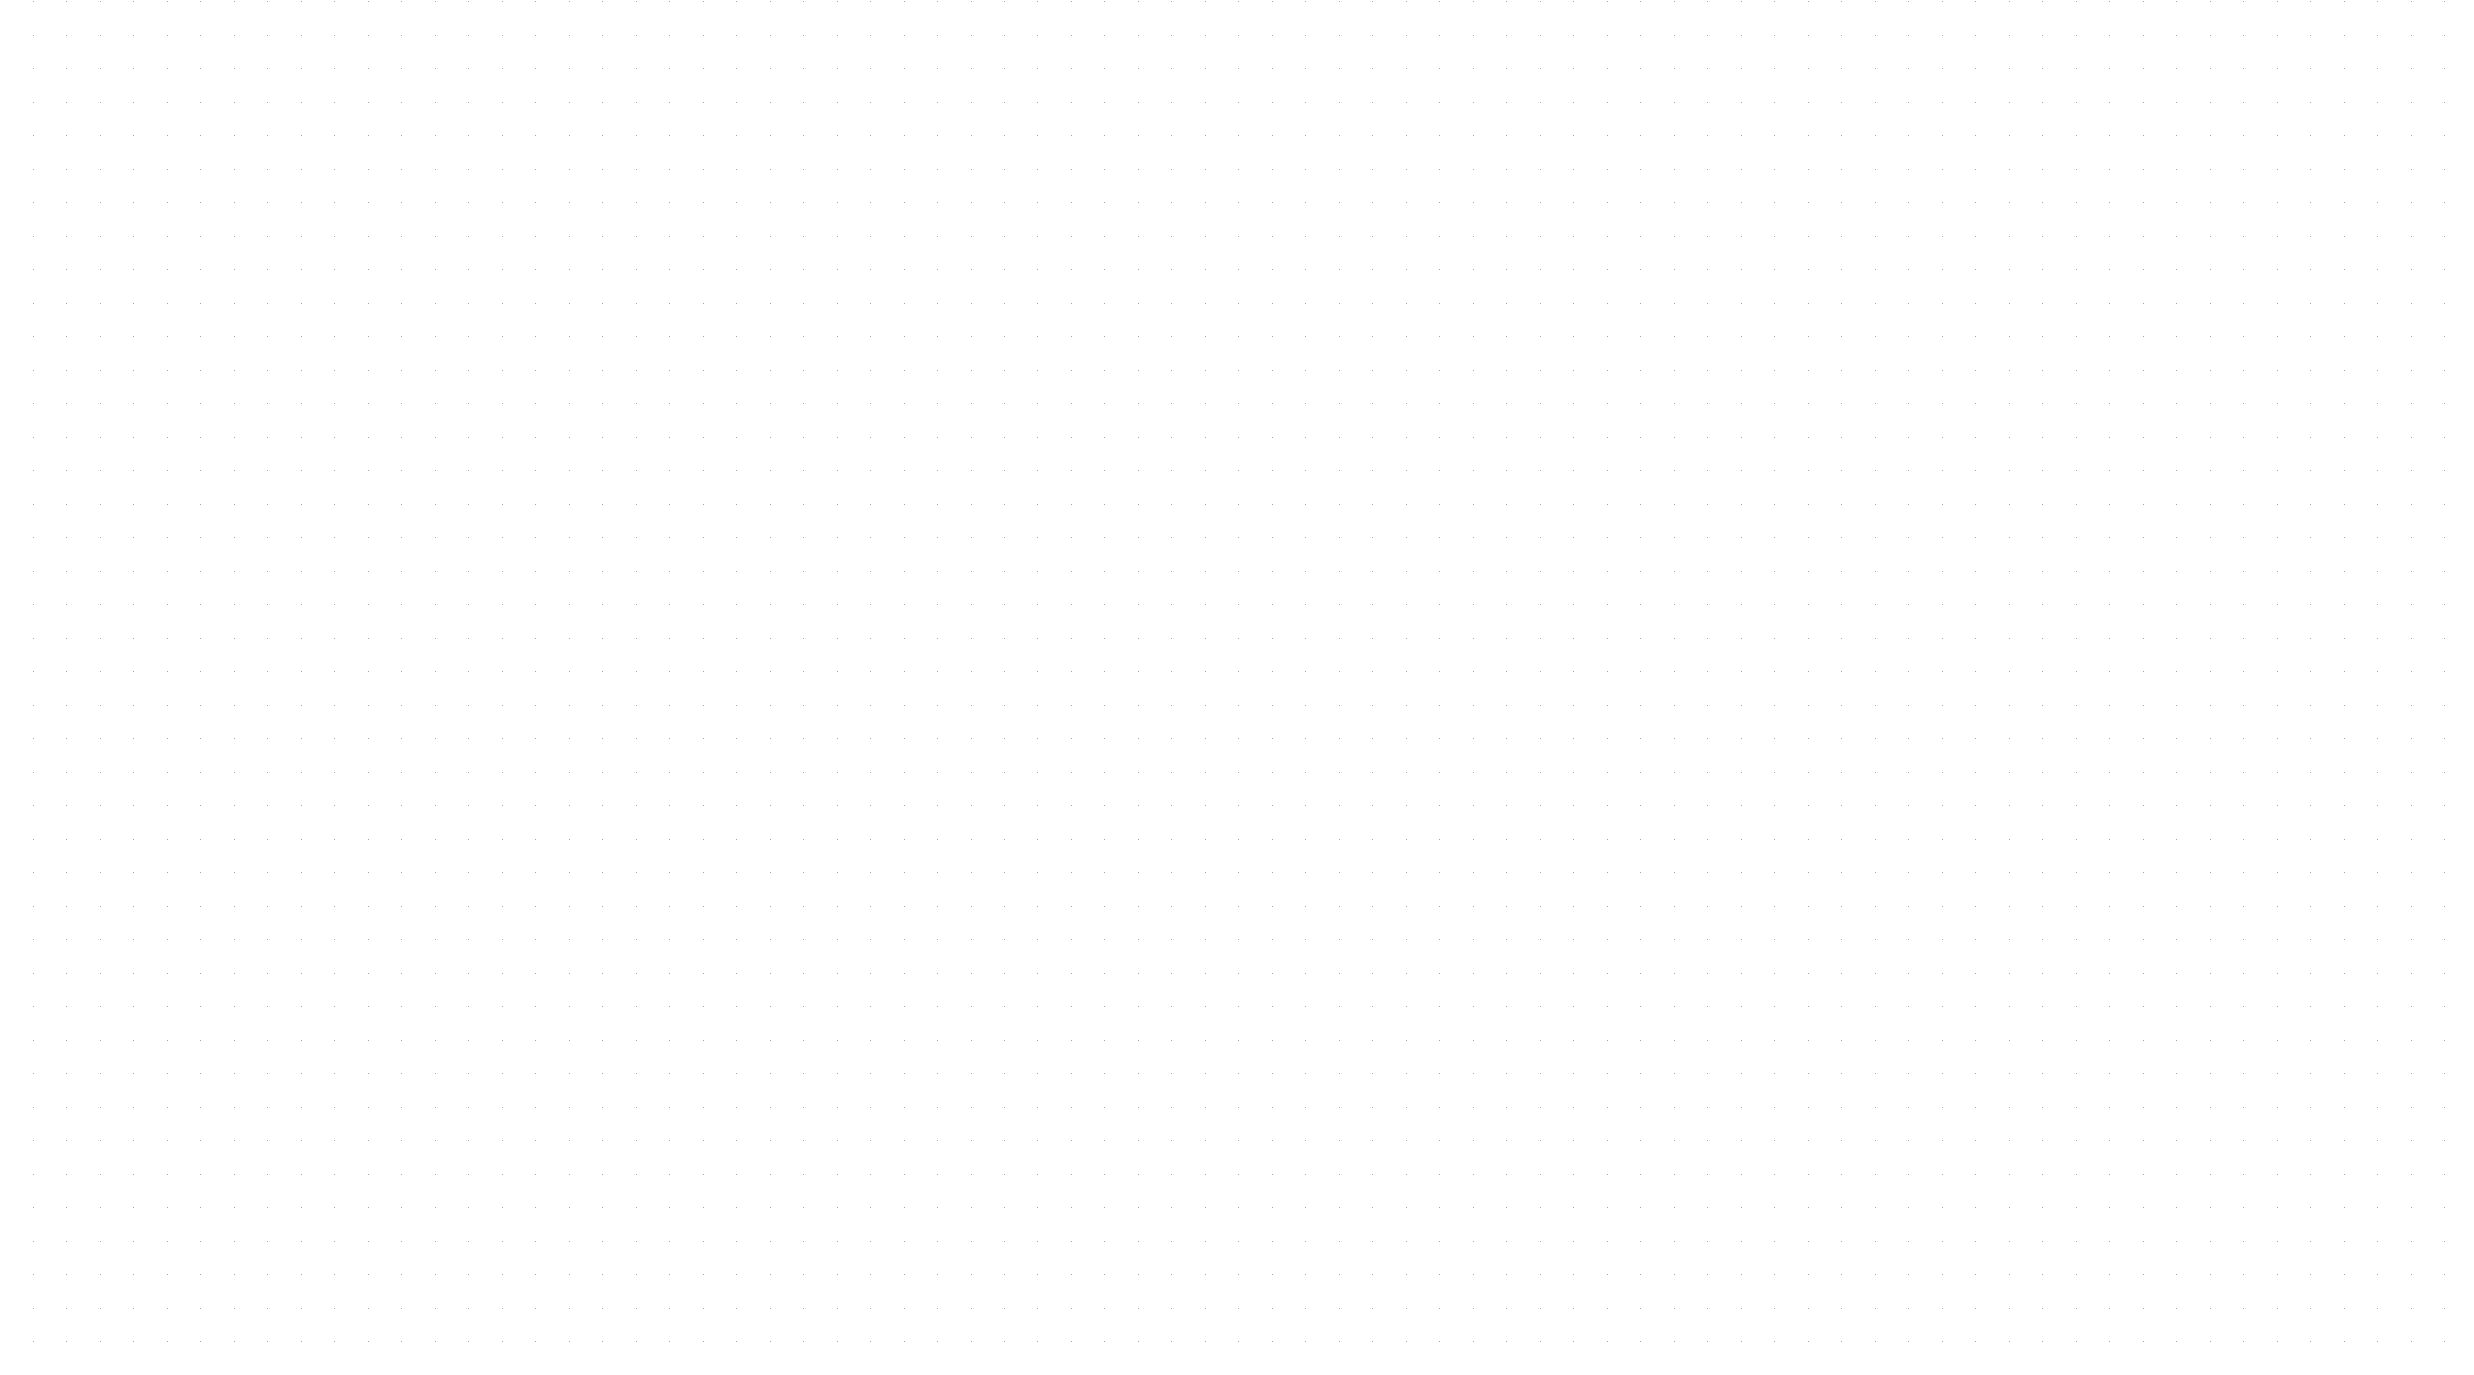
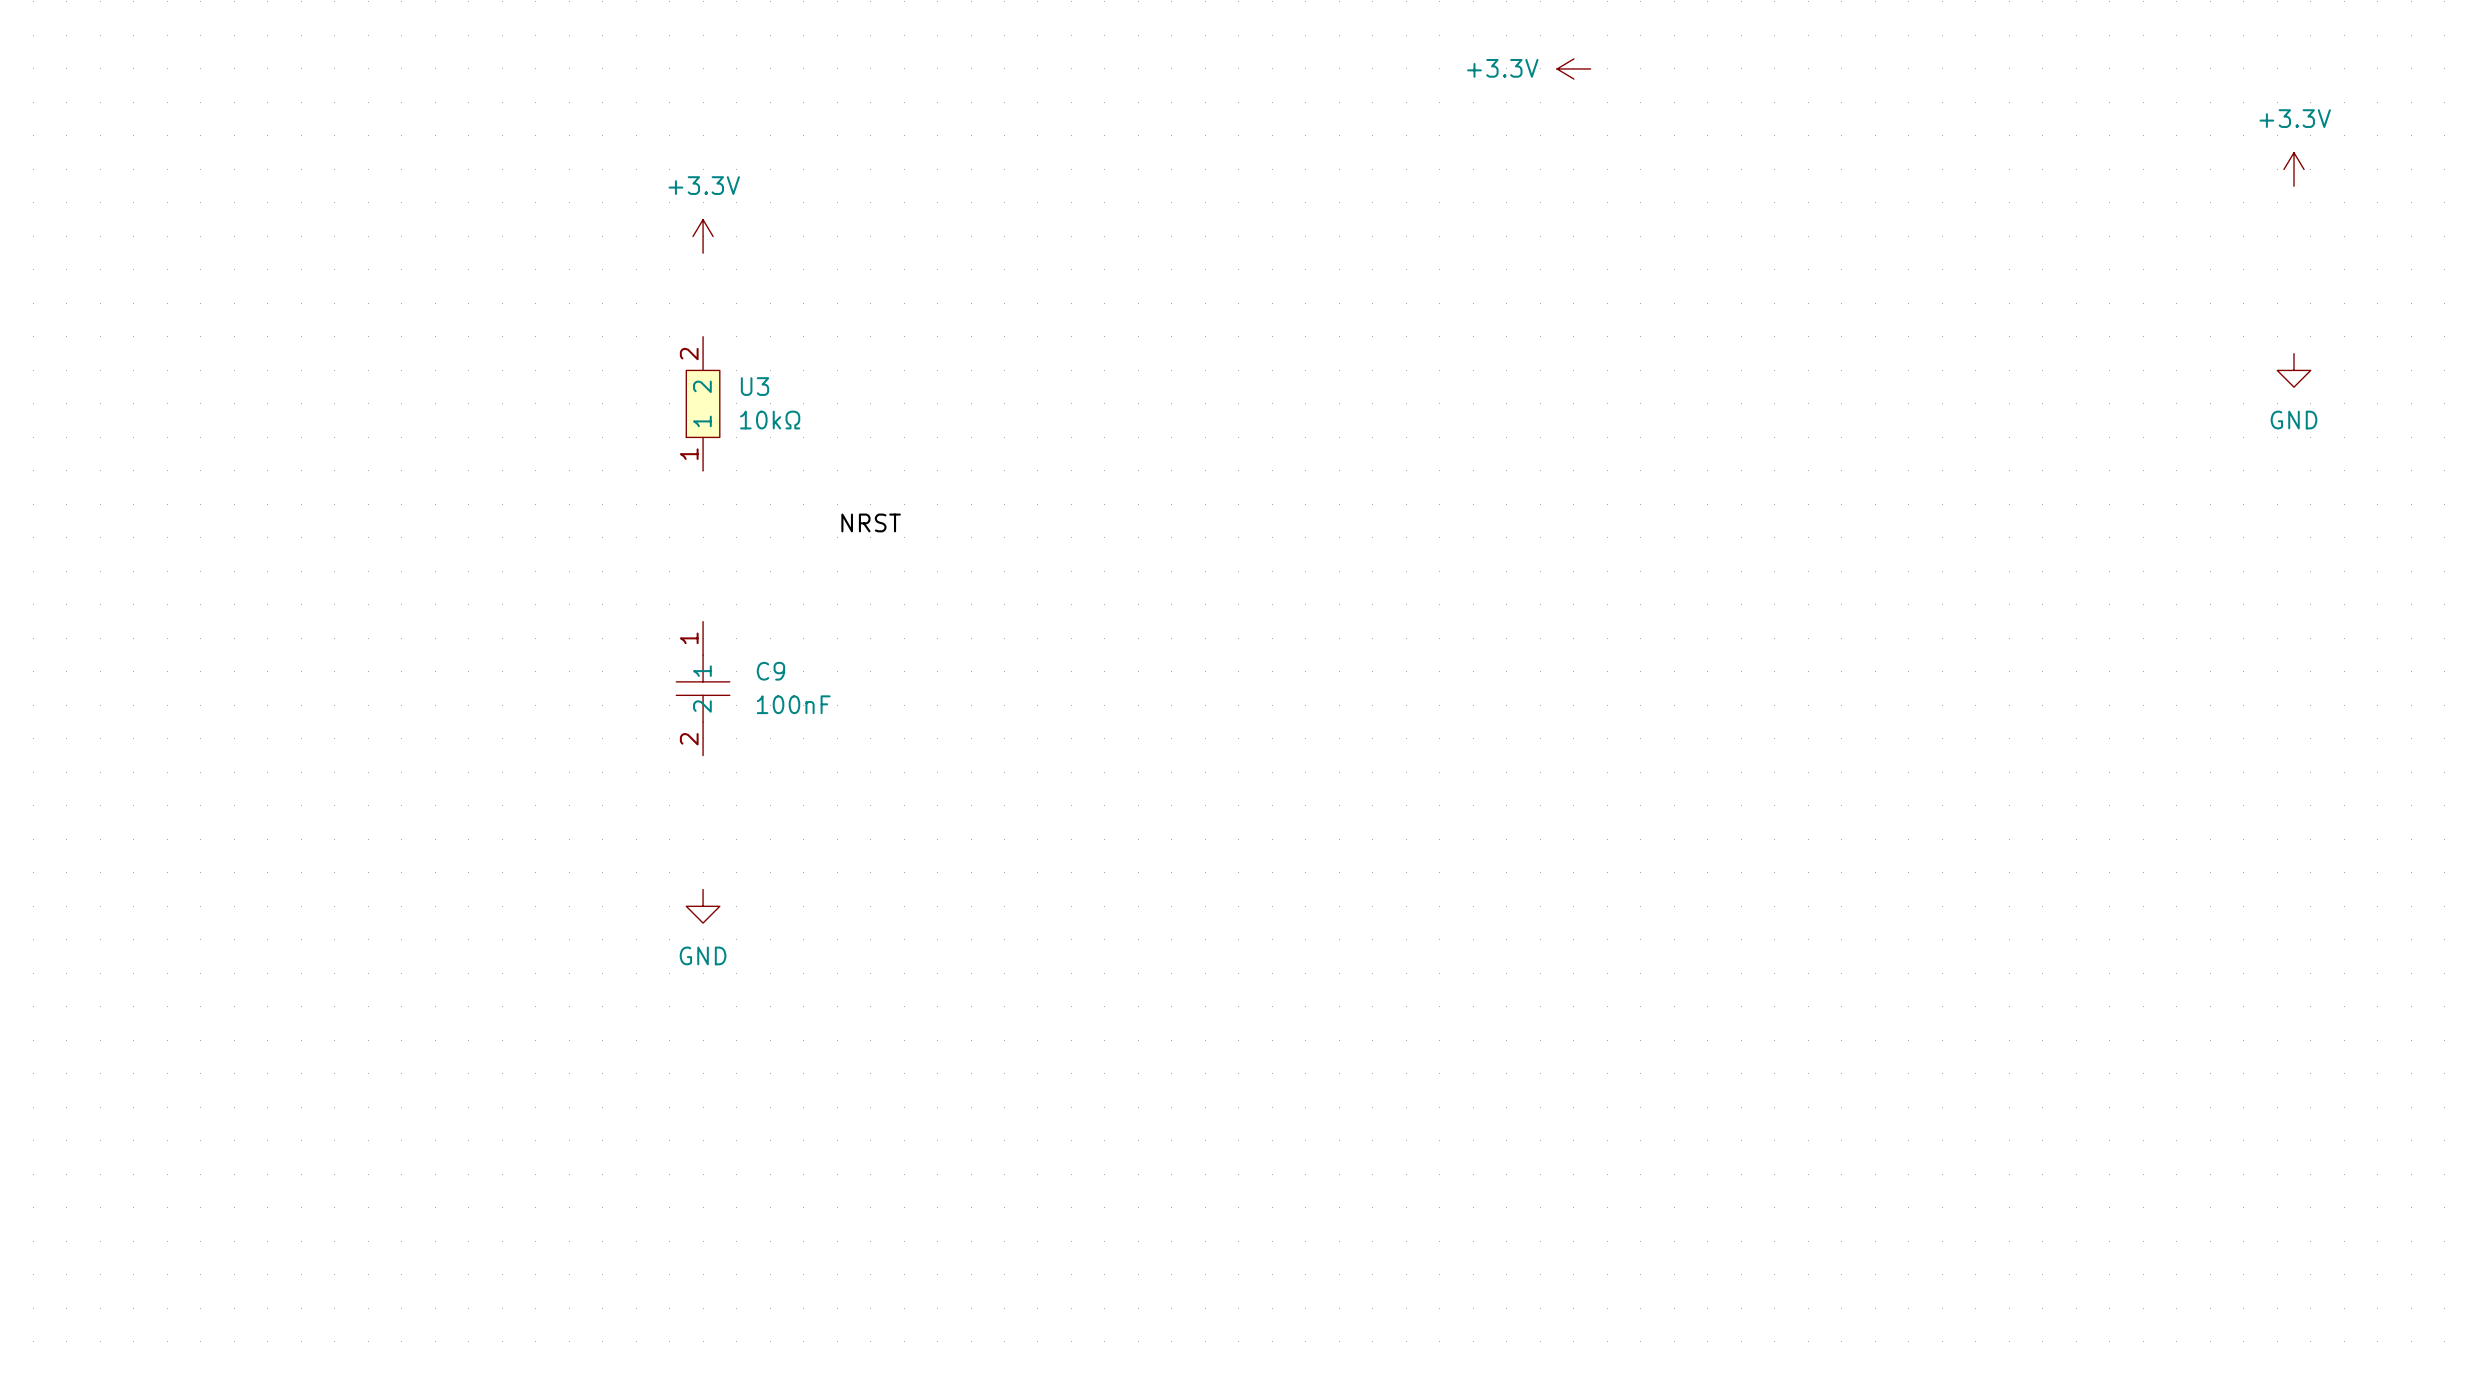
power symbol: none -> +3.3V (1573, 68)
power symbol: none -> +3.3V (2294, 169)
power symbol: none -> +3.3V (703, 236)
power symbol: none -> GND (2294, 370)
U3: none -> 10kΩ (703, 403)
label: none -> NRST (871, 522)
C9: none -> 100nF (703, 688)
power symbol: none -> GND (703, 906)

